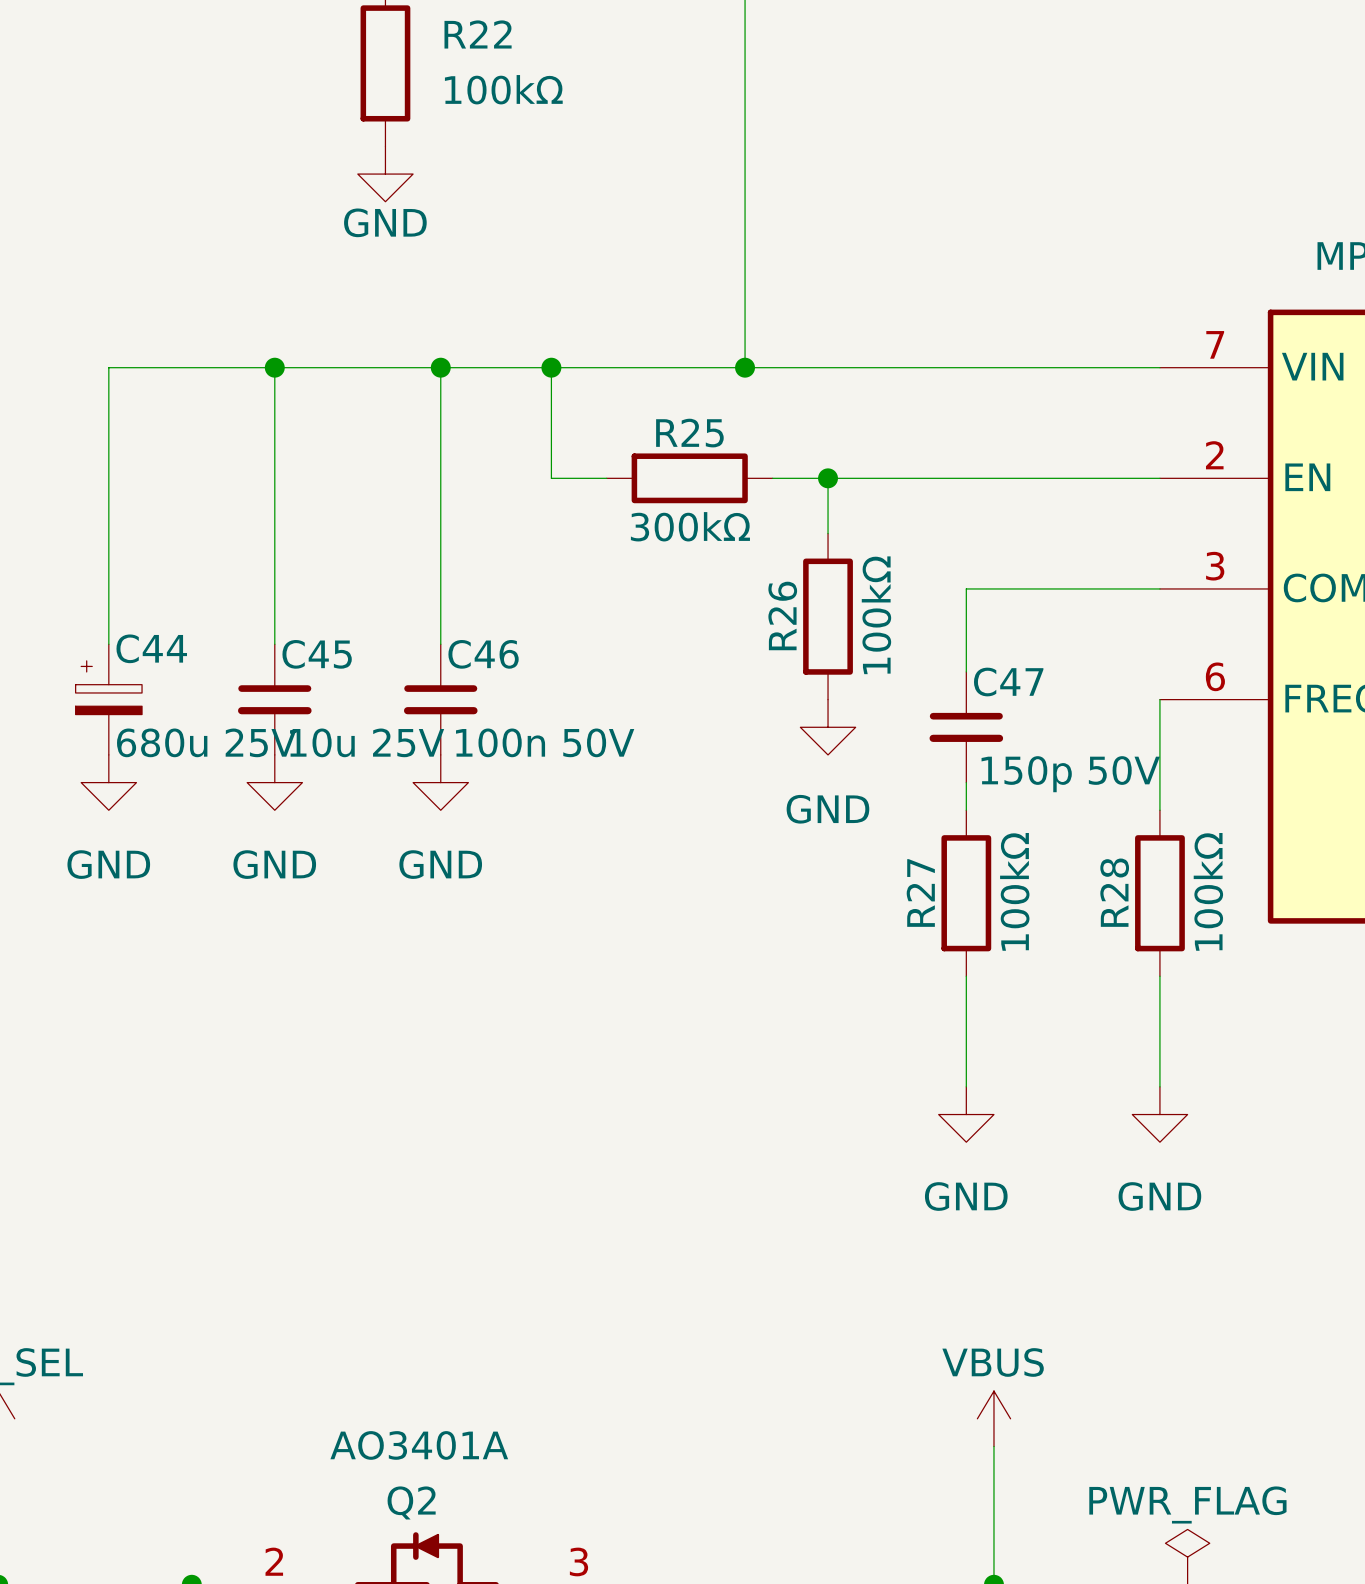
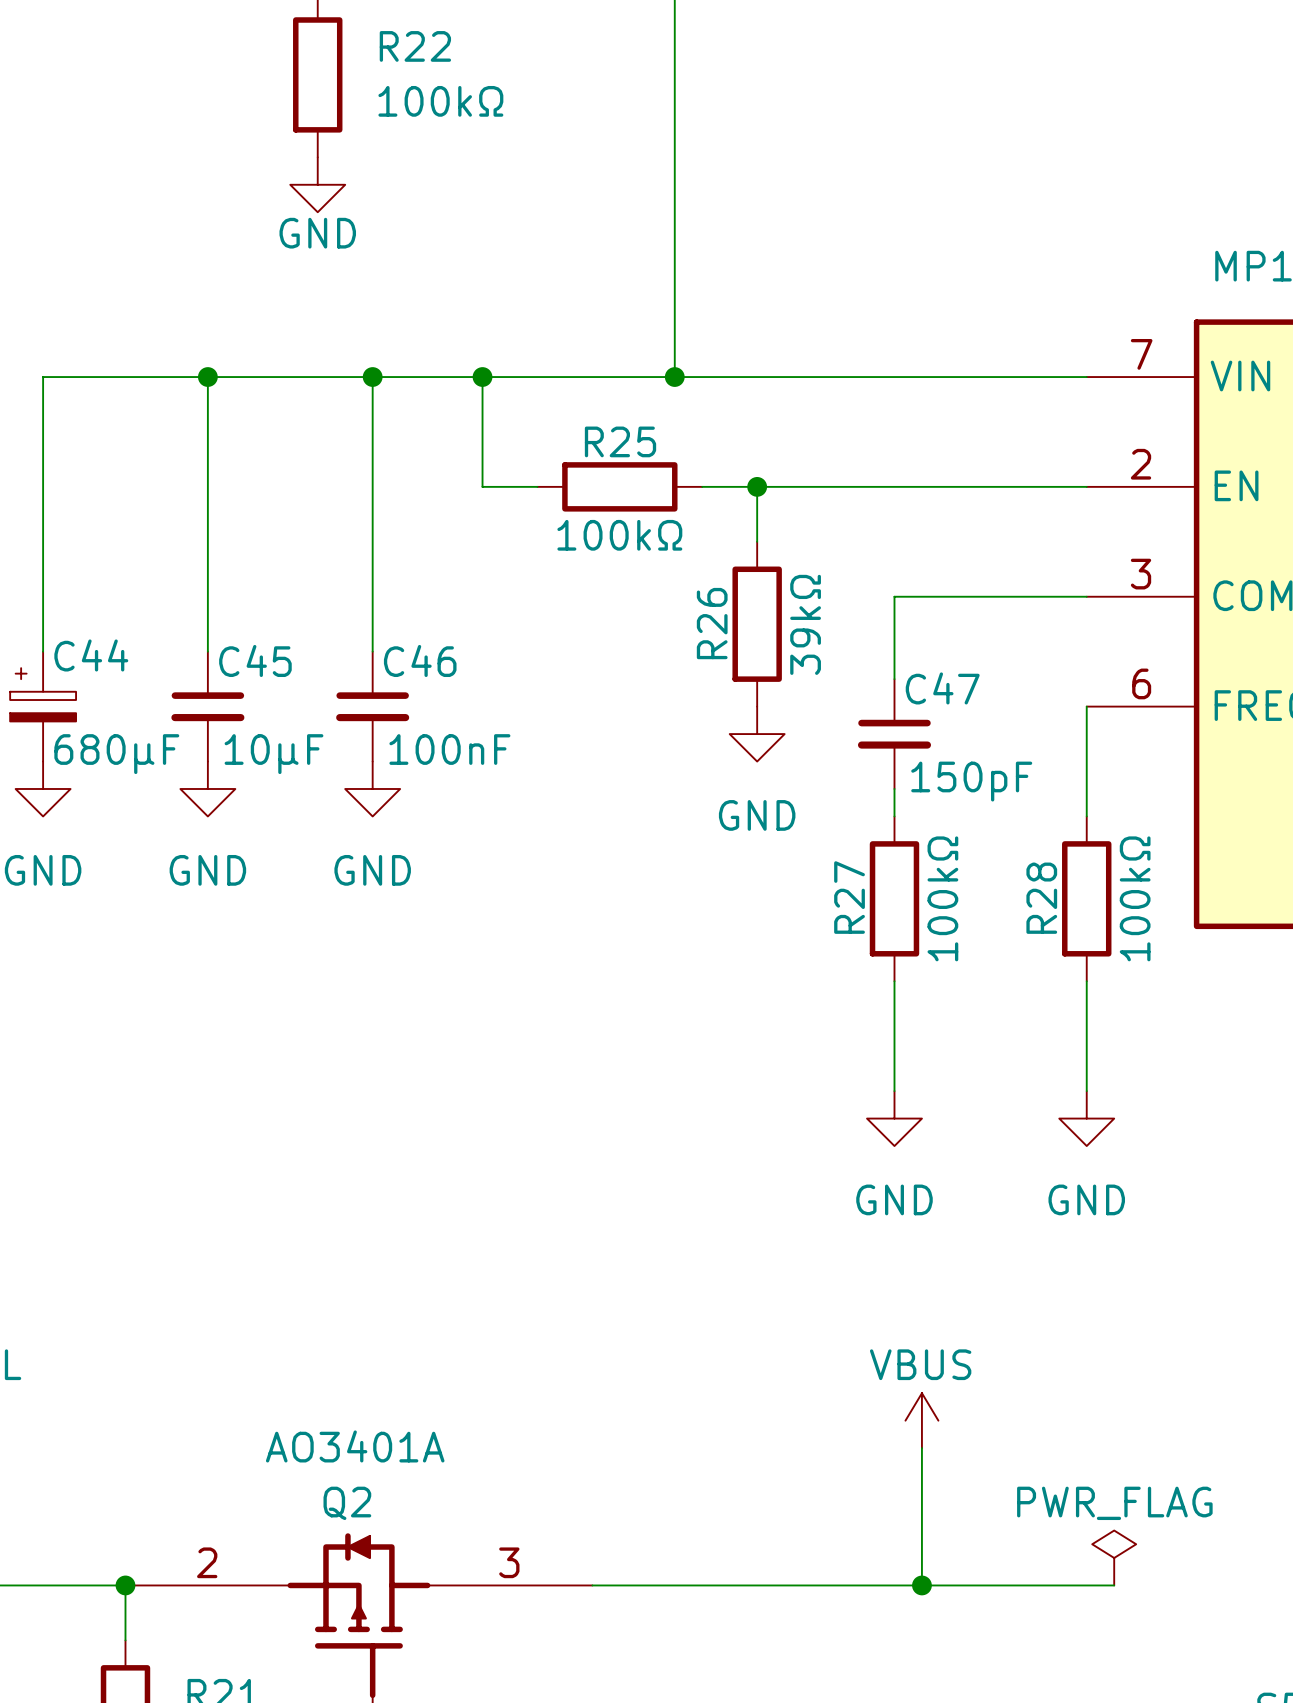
R25 value: 300kΩ (690, 526) -> 100kΩ (619, 535)
R26 value: 100kΩ (876, 615) -> 39kΩ (805, 624)
C44 value: 680u 25V (206, 742) -> 680µF (116, 754)
C45 value: 10u 25V (367, 742) -> 10µF (274, 754)
C46 value: 100n 50V (545, 742) -> 100nF (449, 749)
C47 value: 150p 50V (1070, 774) -> 150pF (971, 781)

